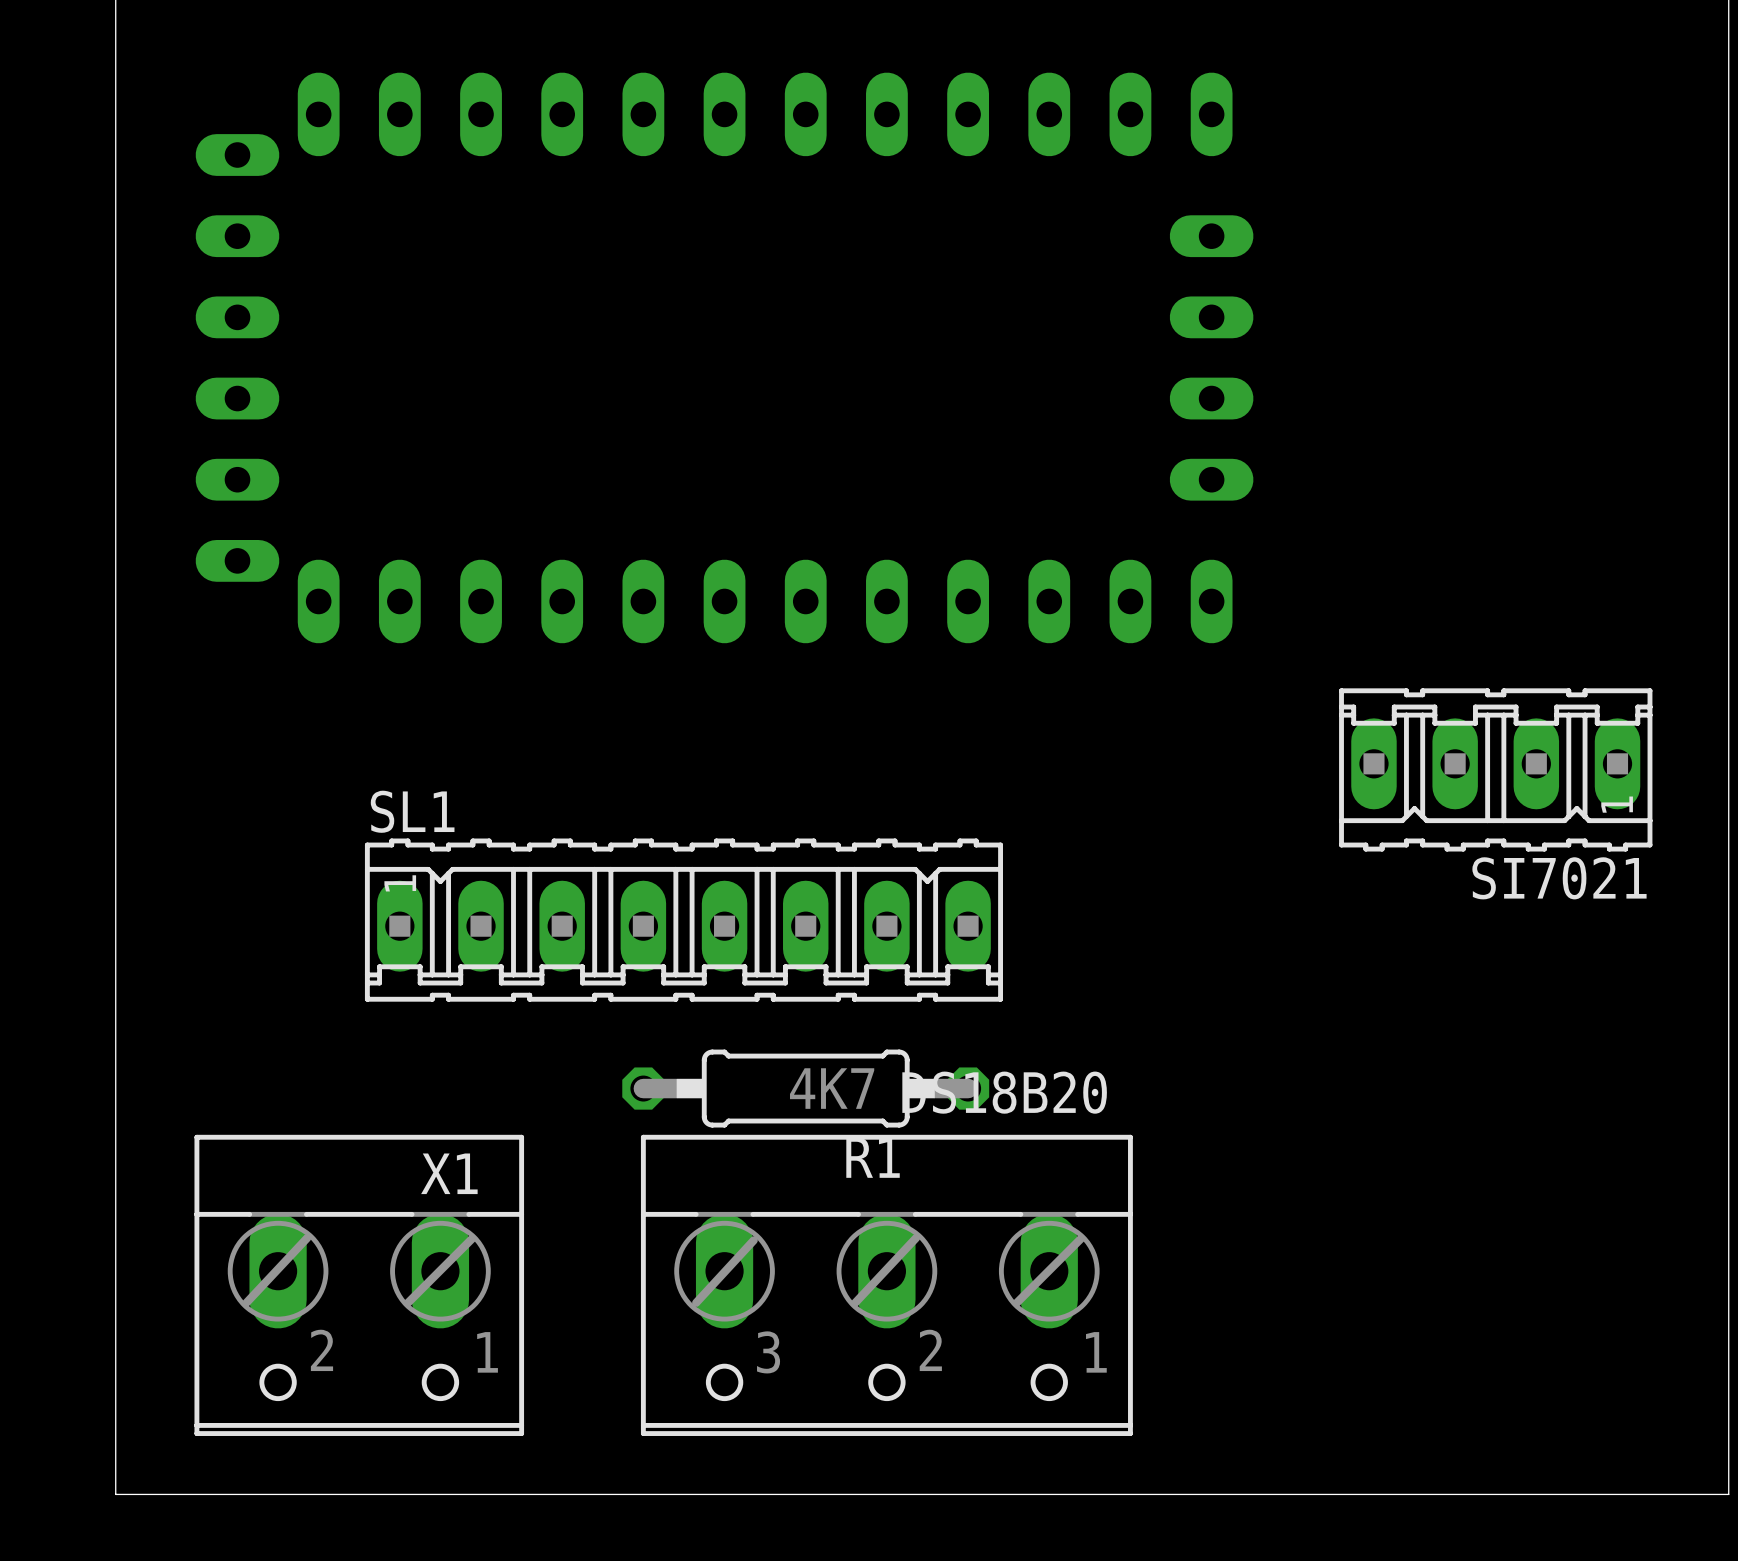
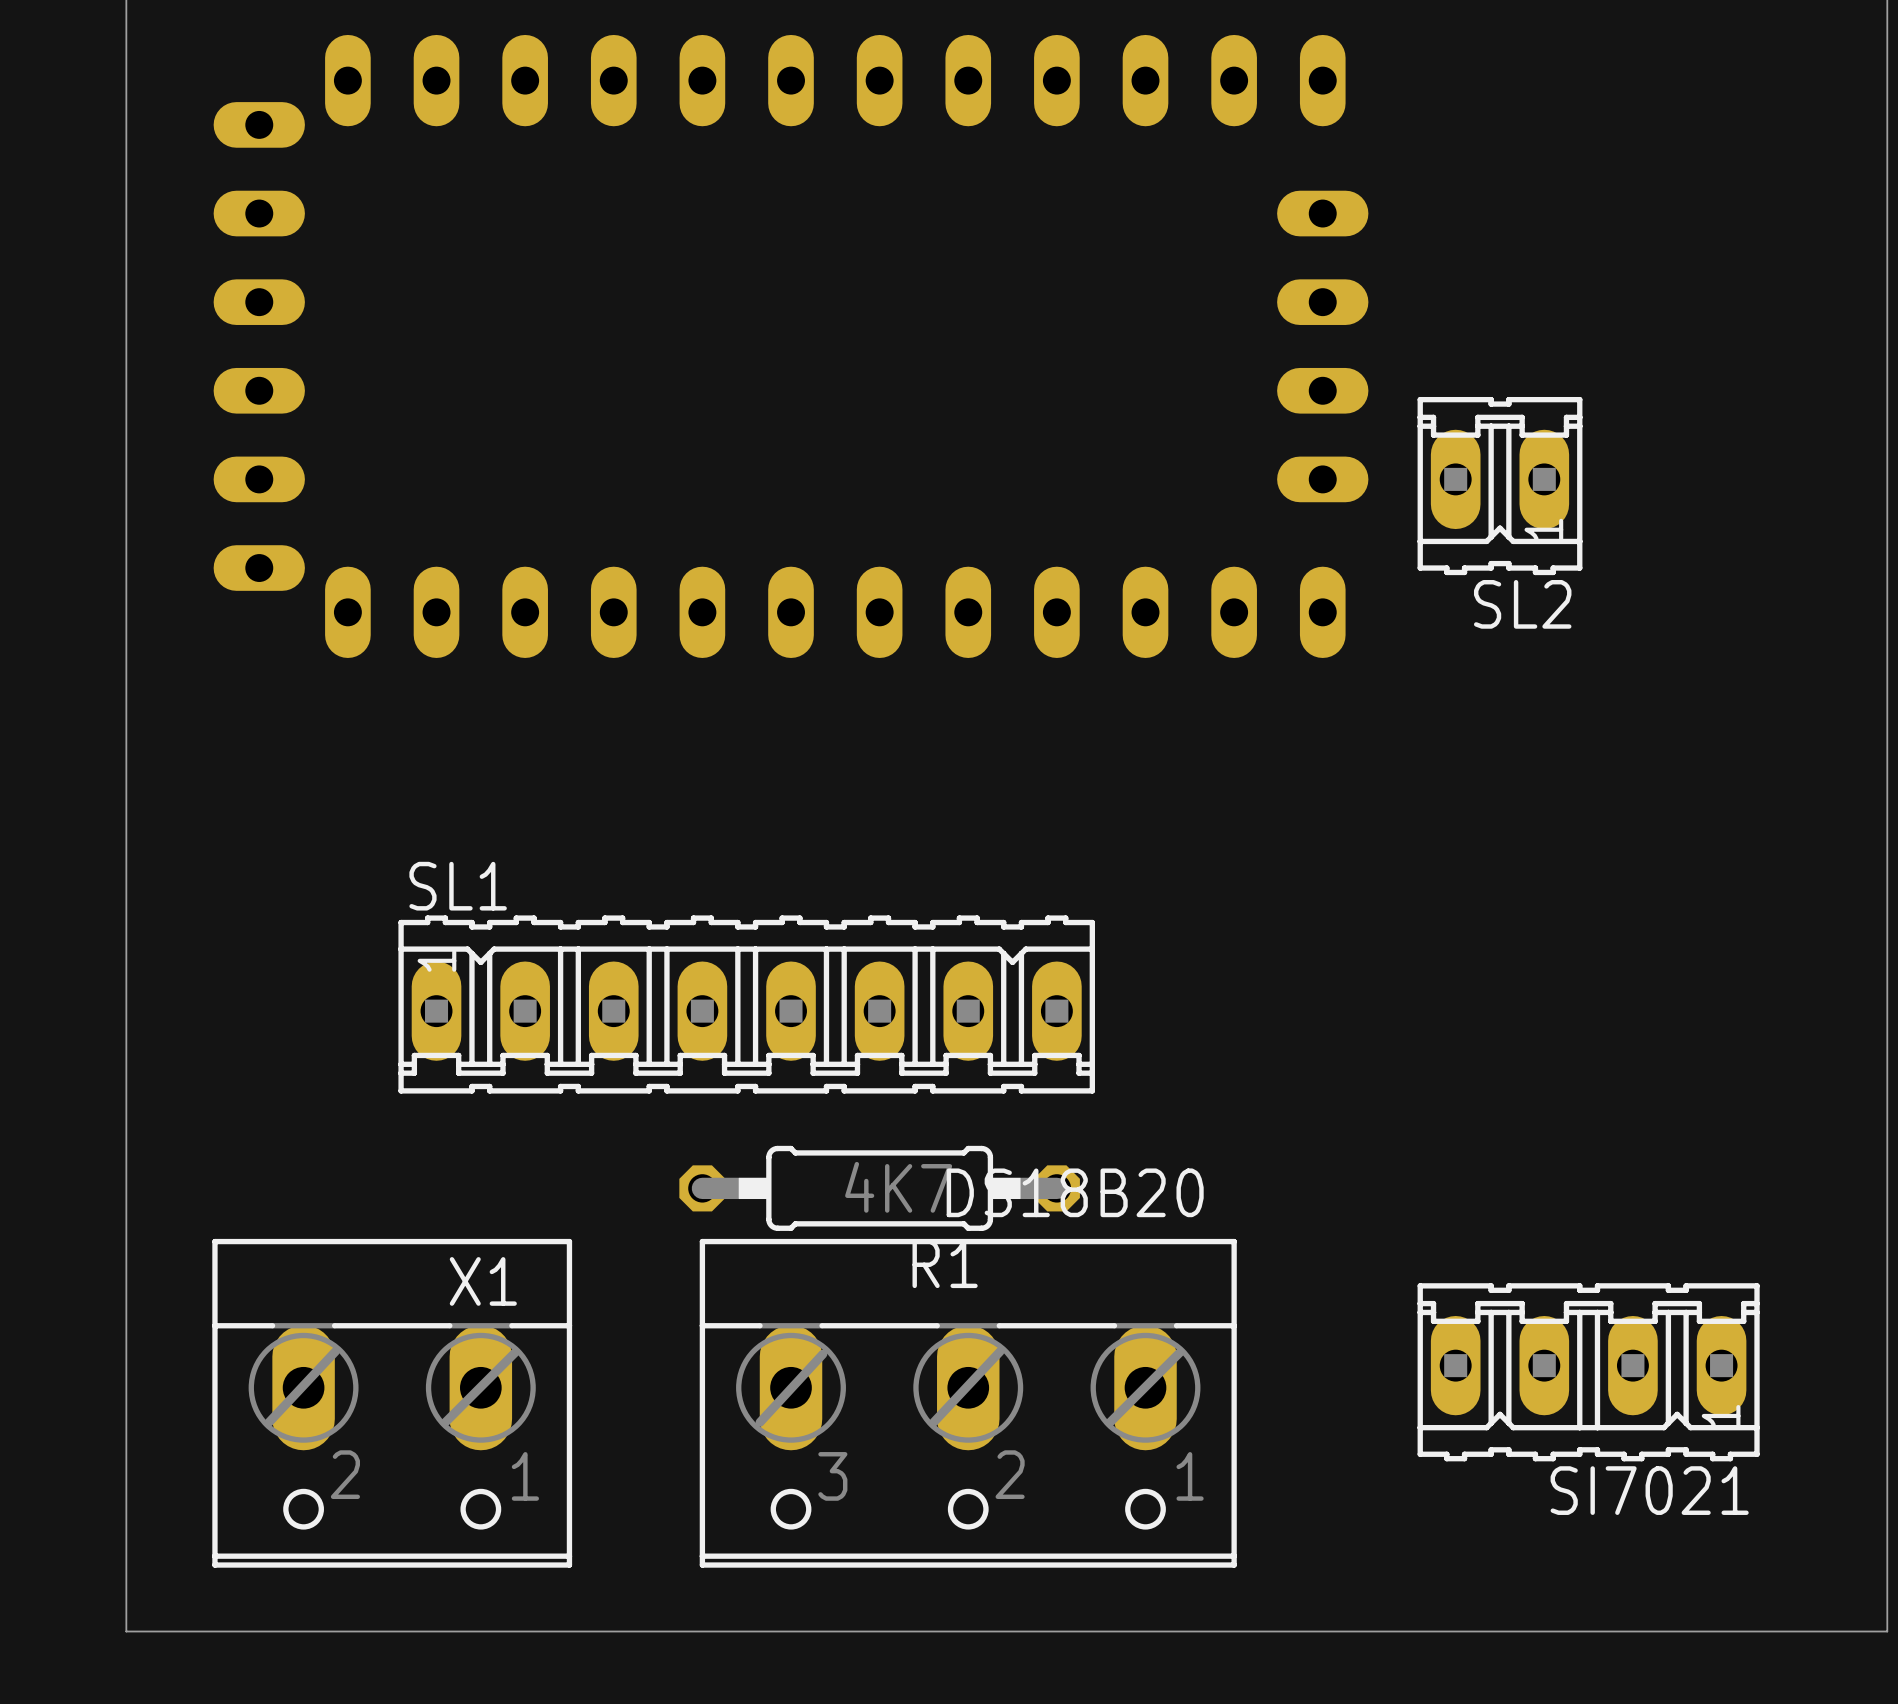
part position: (724, 357) -> (791, 346)
SL2: none -> (1500, 486)
SI7021 position: (1495, 769) -> (1588, 1372)

